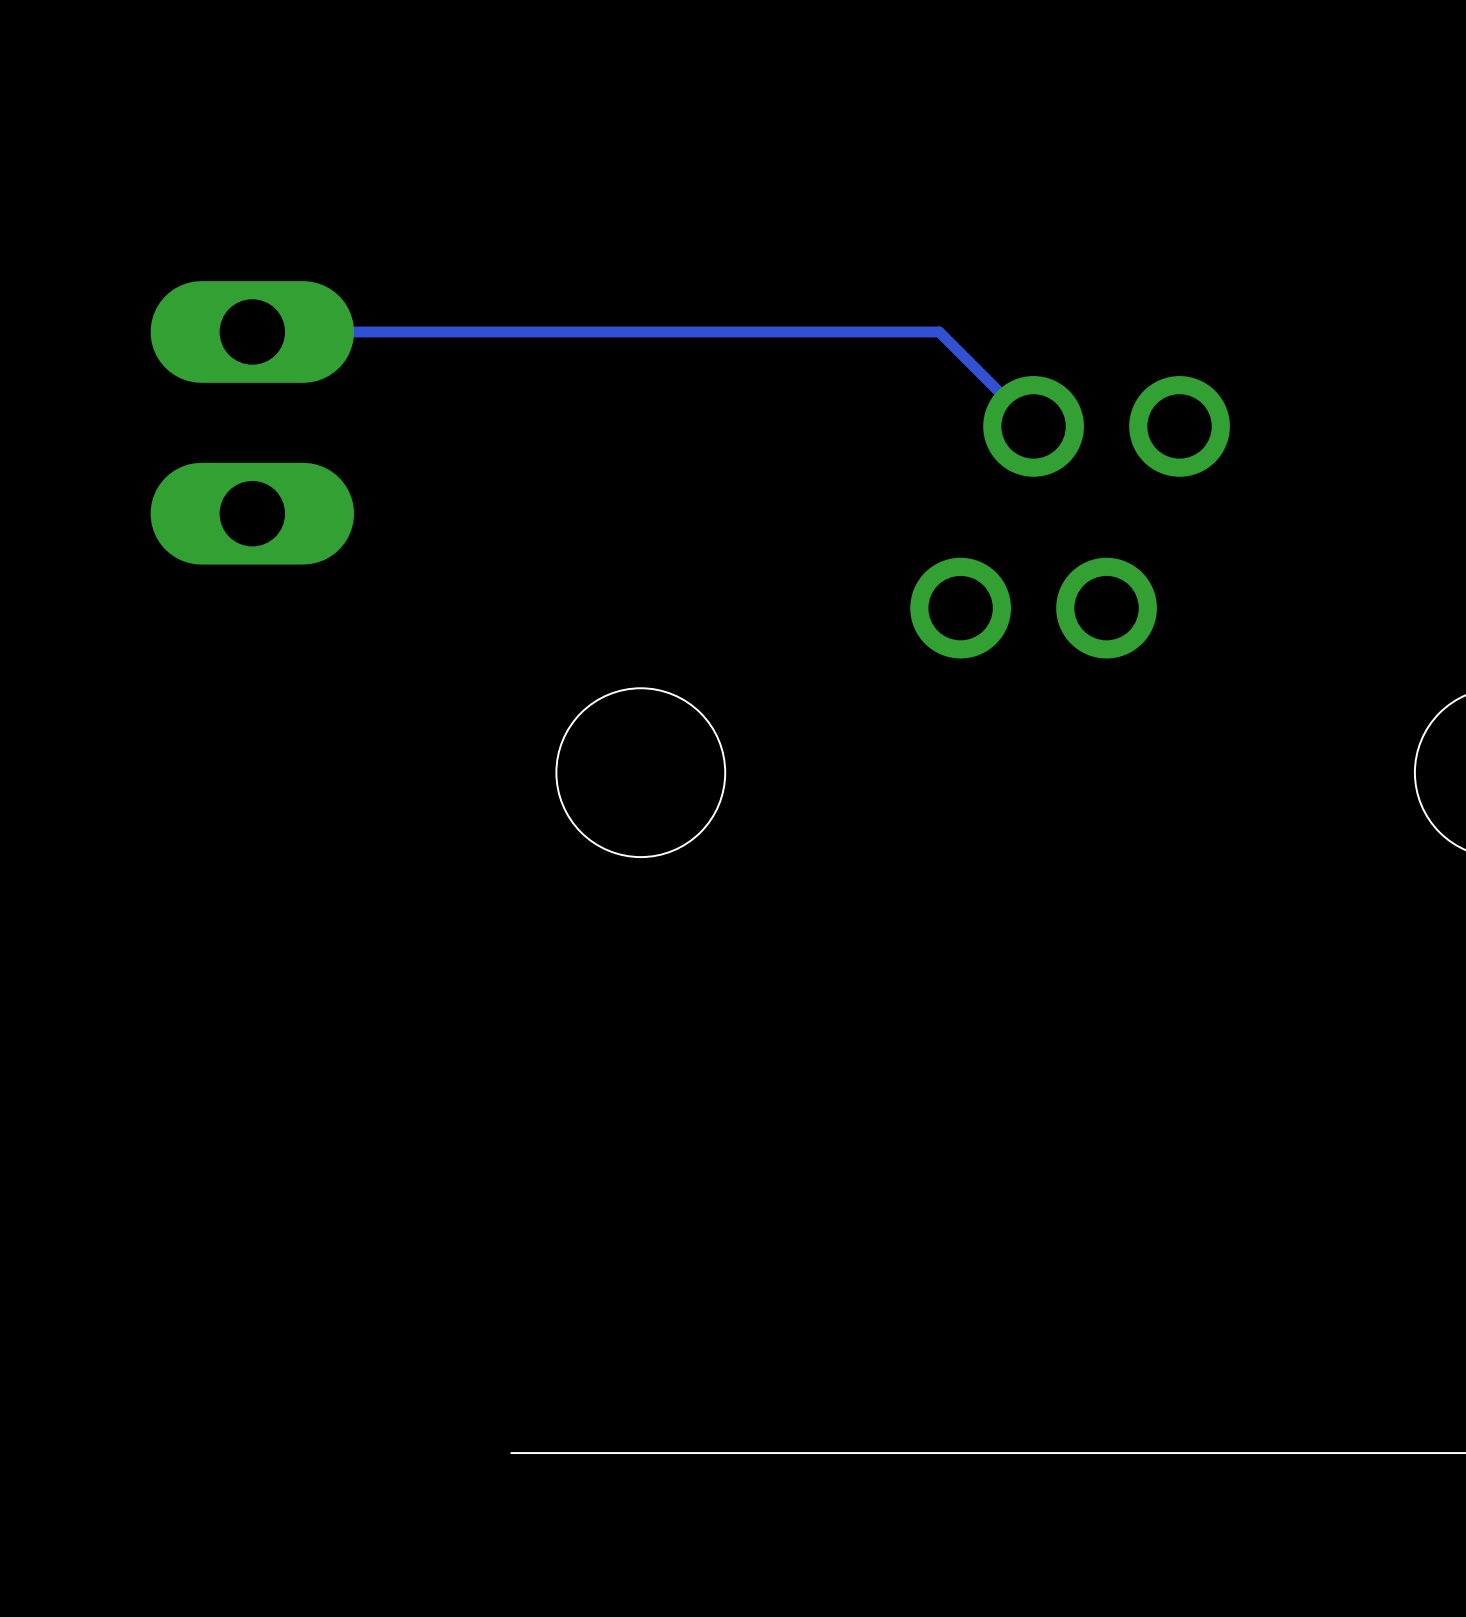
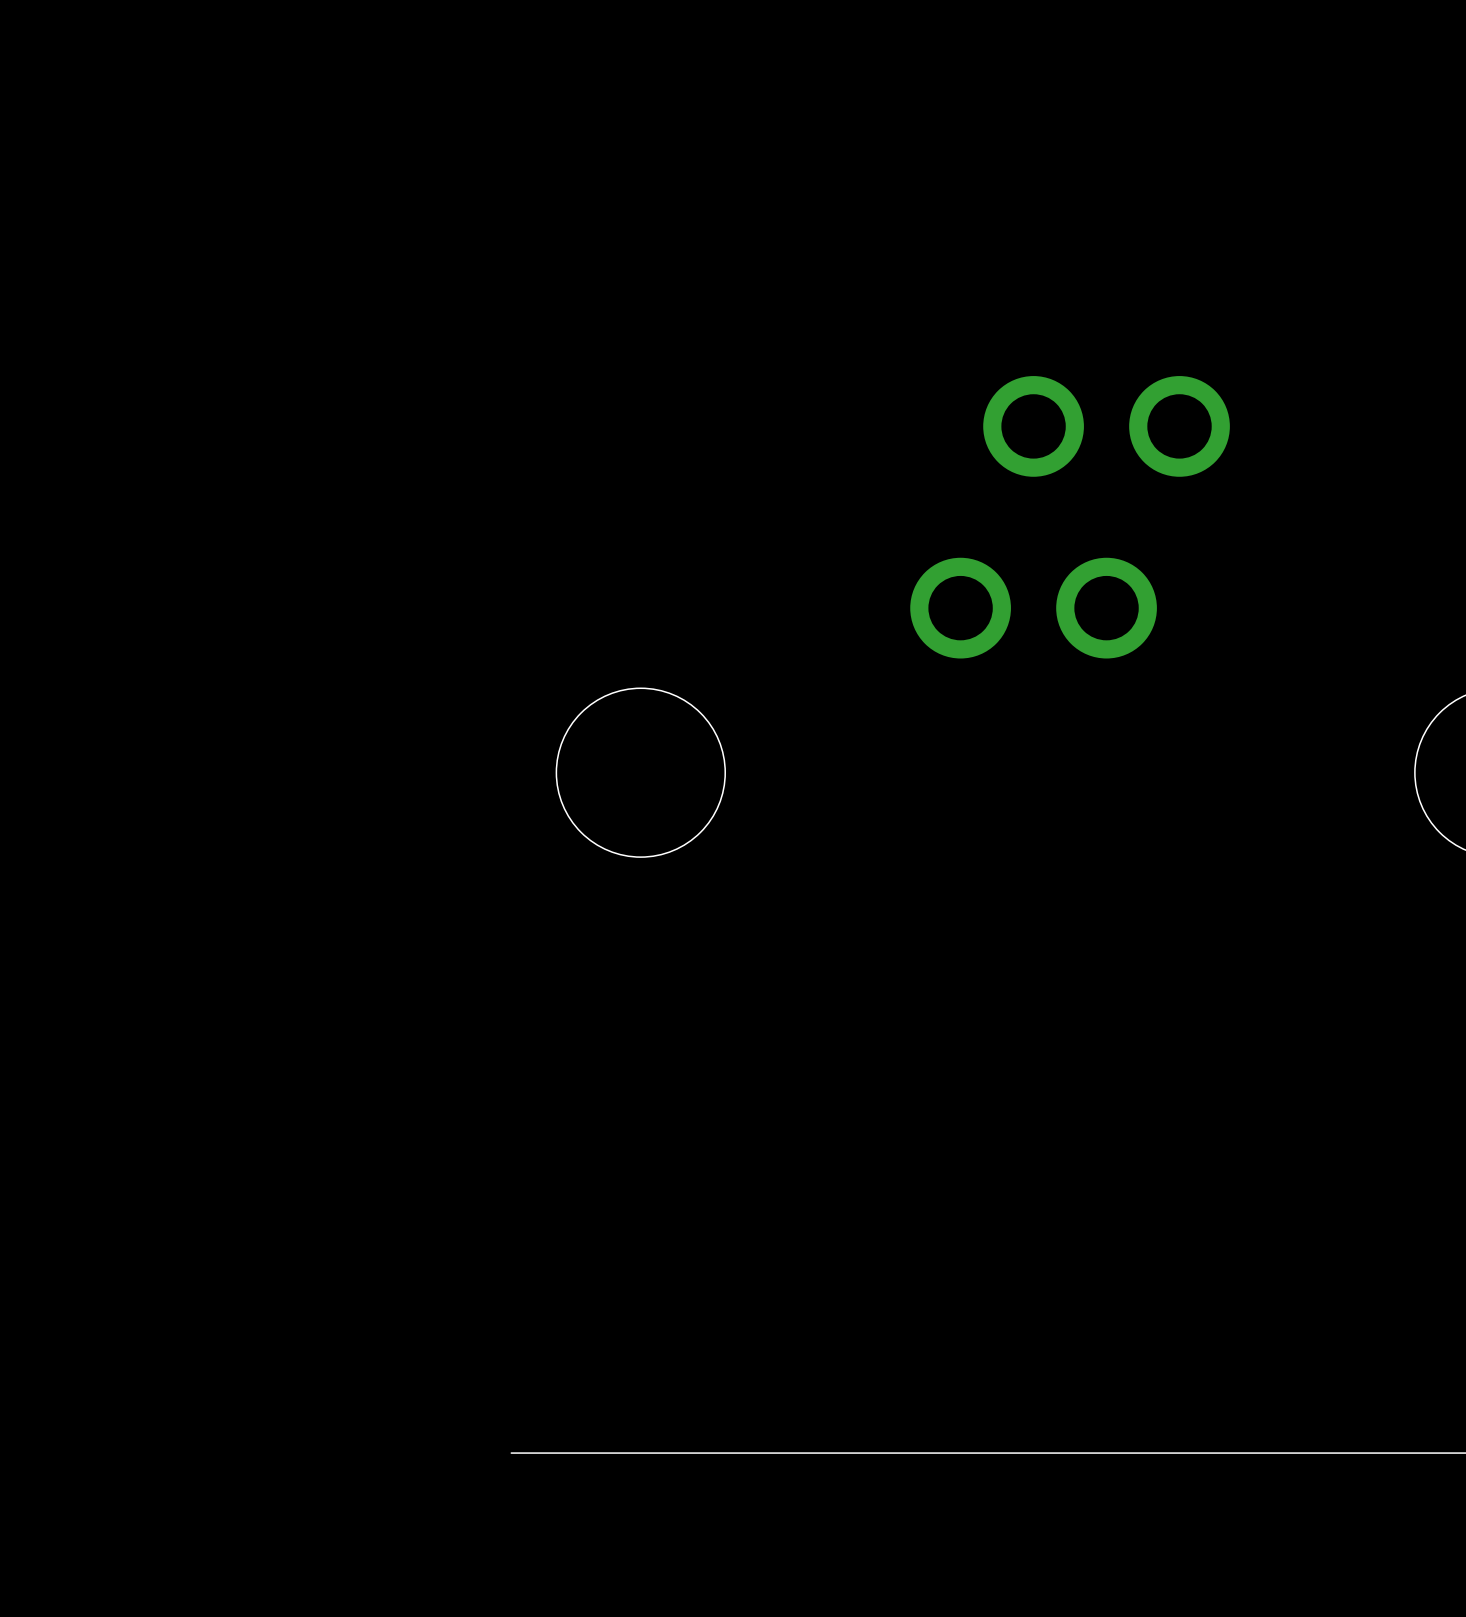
track: (252, 331) (939, 331) (1033, 426) -> none
part: (252, 422) -> none

